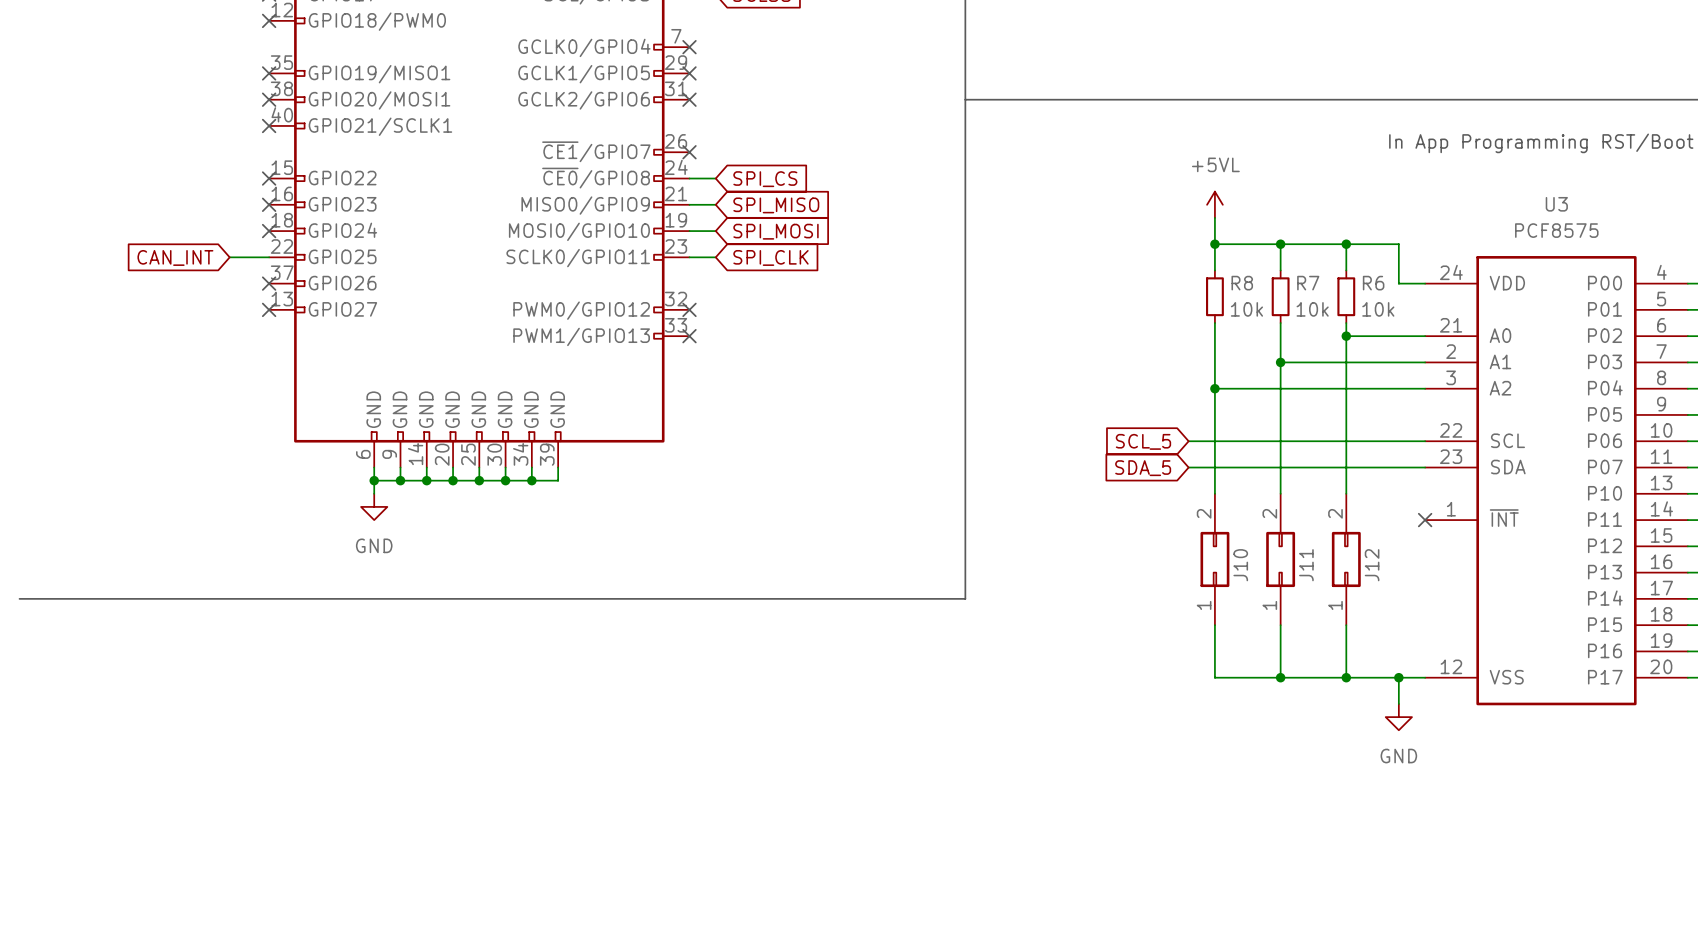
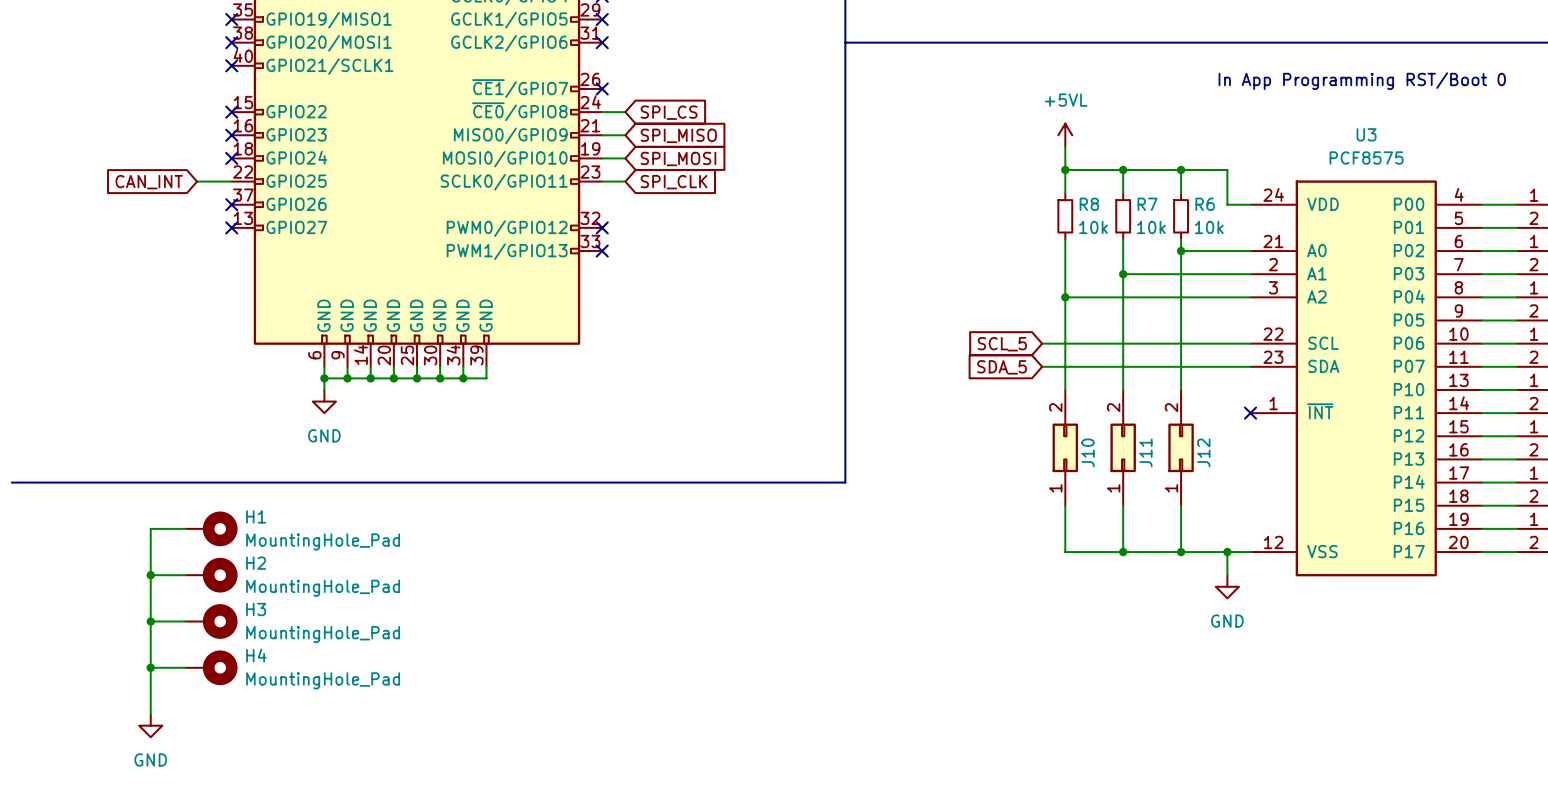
wire: none -> (185, 528) (150, 528) (150, 714)
H1: none -> MountingHole_Pad (211, 528)
wire: none -> (150, 575) (185, 575)
junction: none -> (150, 575)
H2: none -> MountingHole_Pad (211, 575)
wire: none -> (150, 621) (185, 621)
junction: none -> (150, 621)
H3: none -> MountingHole_Pad (211, 621)
wire: none -> (150, 667) (185, 667)
junction: none -> (150, 667)
H4: none -> MountingHole_Pad (211, 667)
power symbol: none -> GND (150, 725)

